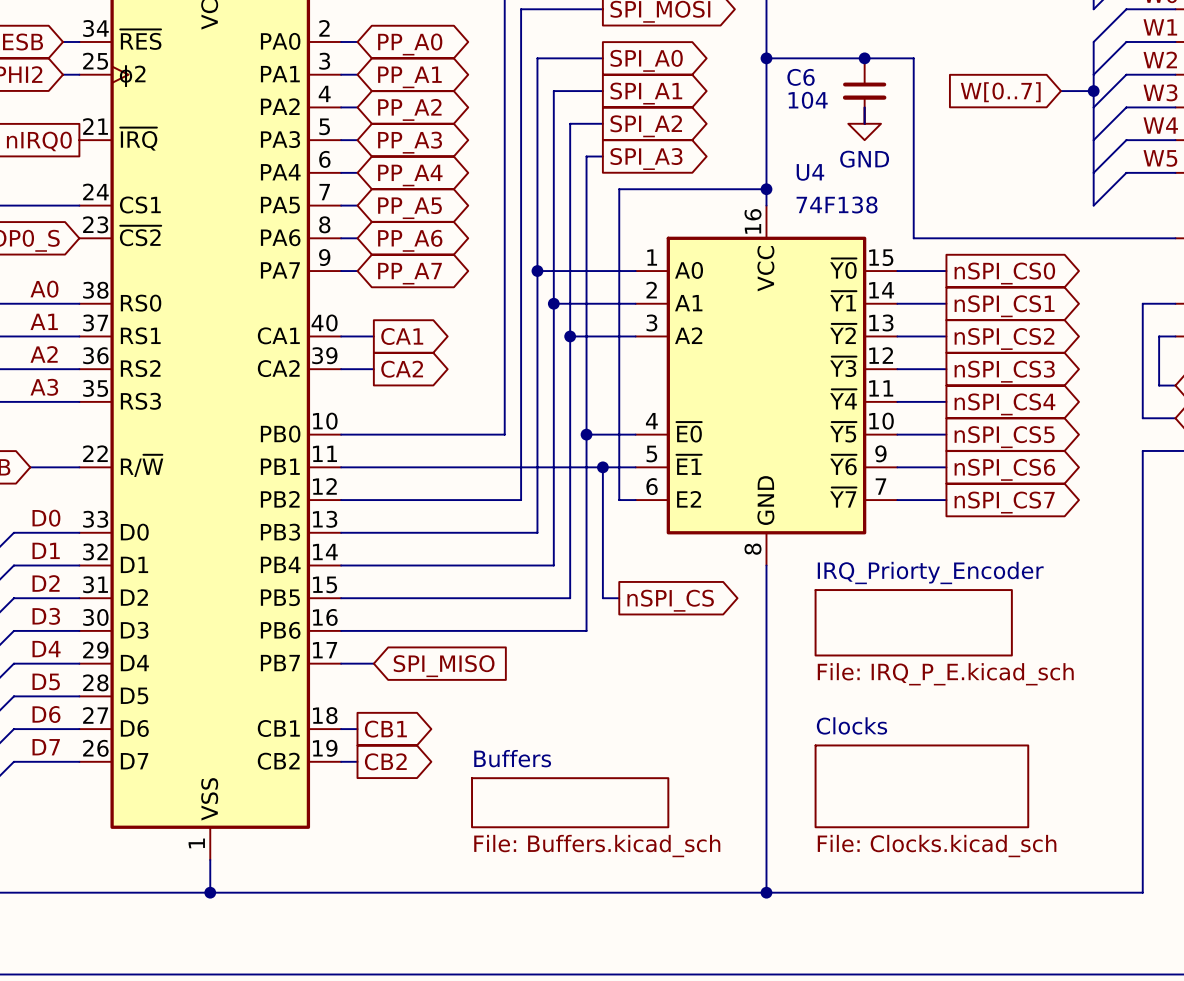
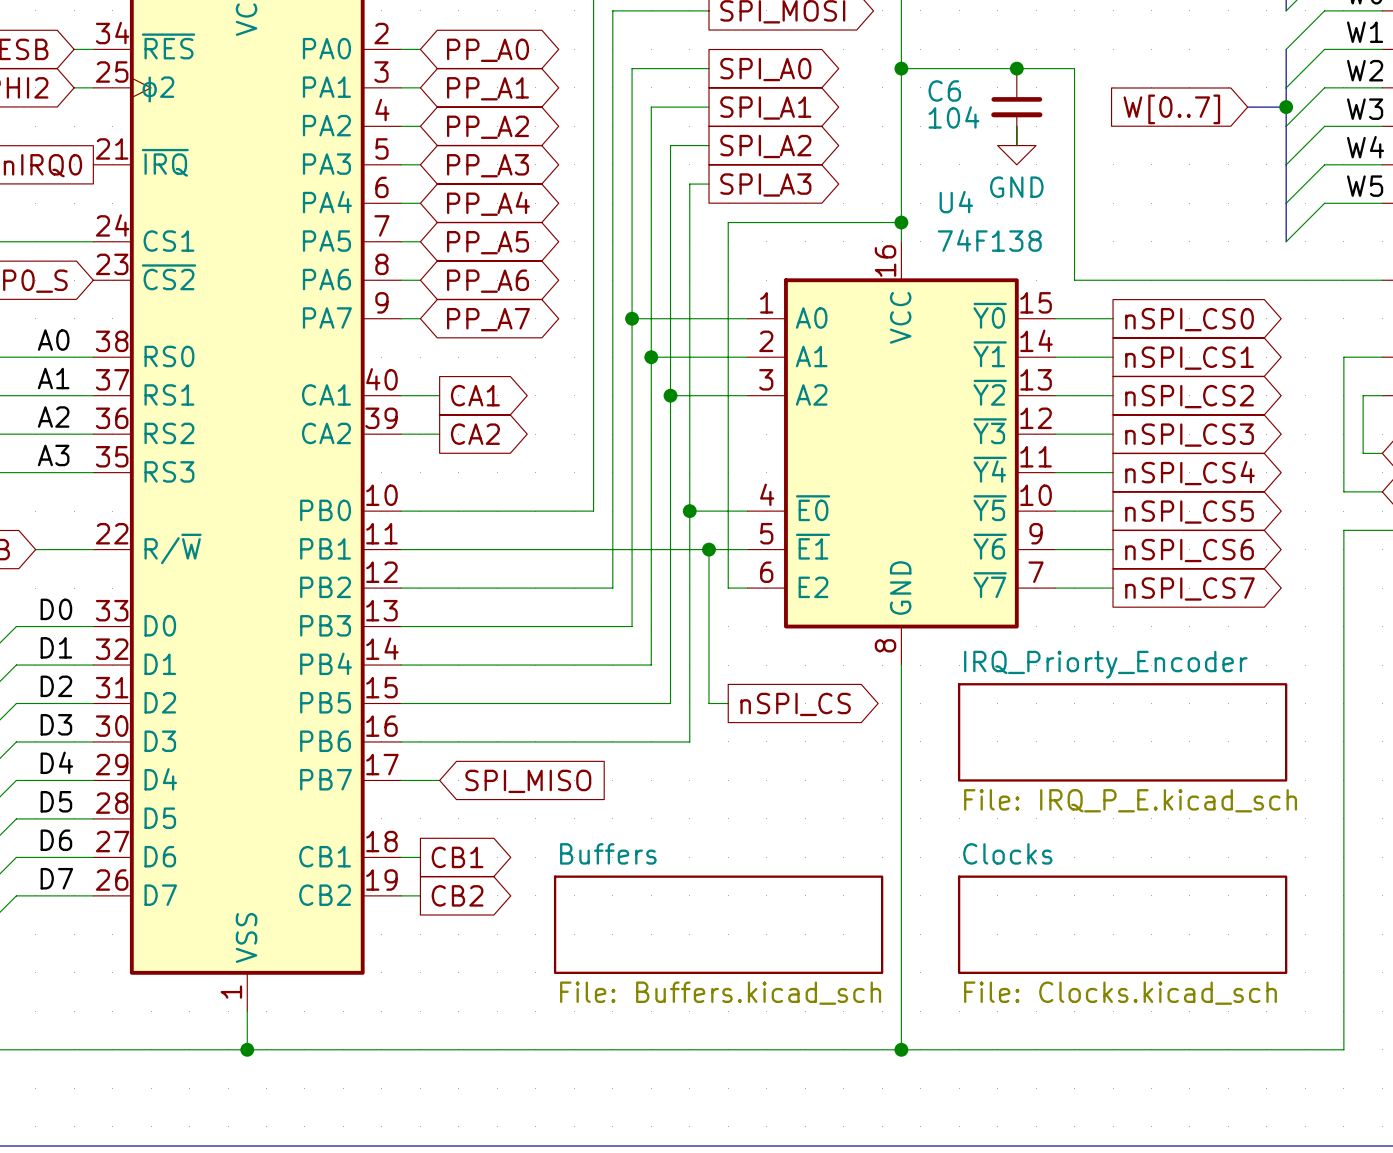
sheet IRQ_Priorty_Encoder: File: IRQ_P_E.kicad_sch (913, 622) -> none
sheet IRQ_Priorty_Encoder: none -> File: IRQ_P_E.kicad_sch (1122, 732)
sheet Buffers: none -> File: Buffers.kicad_sch (718, 924)
sheet Clocks: File: Clocks.kicad_sch (921, 786) -> none
sheet Clocks: none -> File: Clocks.kicad_sch (1122, 924)
sheet Buffers: File: Buffers.kicad_sch (570, 802) -> none

